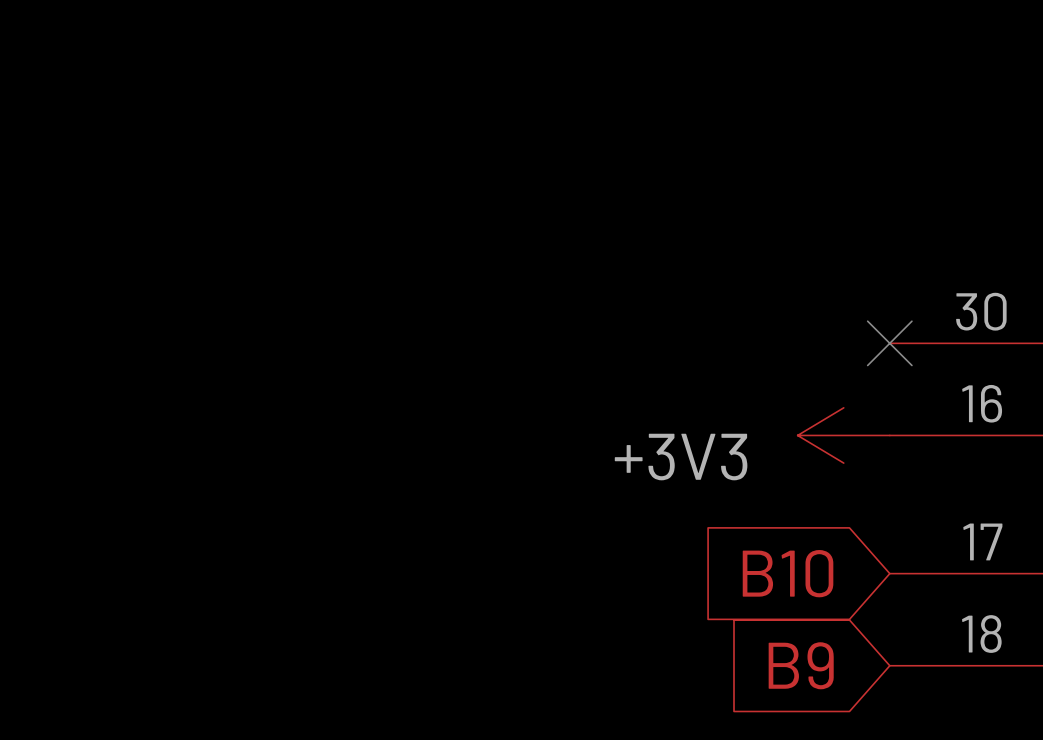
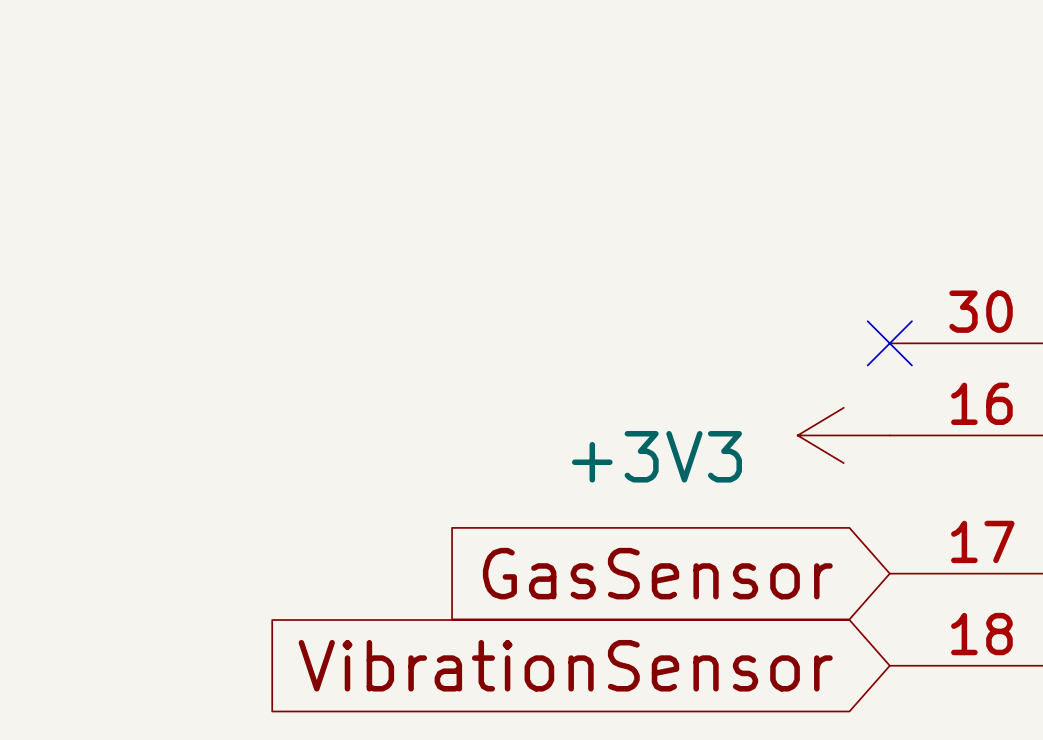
global label: B10 (788, 573) -> GasSensor (657, 573)
global label: B9 (801, 665) -> VibrationSensor (565, 665)

